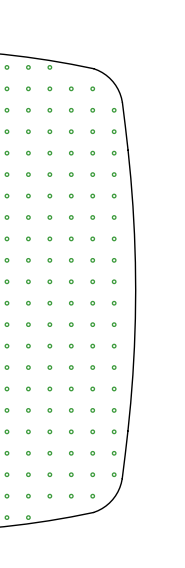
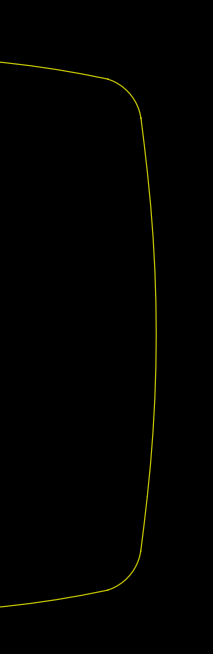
via: (6, 67) -> none
via: (28, 67) -> none
via: (49, 67) -> none
via: (6, 88) -> none
via: (28, 88) -> none
via: (49, 88) -> none
via: (71, 88) -> none
via: (92, 88) -> none
via: (6, 110) -> none
via: (28, 110) -> none
via: (49, 110) -> none
via: (71, 110) -> none
via: (92, 110) -> none
via: (114, 110) -> none
via: (6, 131) -> none
via: (28, 131) -> none
via: (49, 131) -> none
via: (71, 131) -> none
via: (92, 131) -> none
via: (114, 131) -> none
via: (6, 153) -> none
via: (28, 153) -> none
via: (49, 153) -> none
via: (71, 153) -> none
via: (92, 153) -> none
via: (114, 153) -> none
via: (6, 174) -> none
via: (28, 174) -> none
via: (49, 174) -> none
via: (71, 174) -> none
via: (92, 174) -> none
via: (114, 174) -> none
via: (6, 196) -> none
via: (28, 196) -> none
via: (49, 196) -> none
via: (71, 196) -> none
via: (92, 196) -> none
via: (114, 196) -> none
via: (6, 217) -> none
via: (28, 217) -> none
via: (49, 217) -> none
via: (71, 217) -> none
via: (92, 217) -> none
via: (114, 217) -> none
via: (6, 238) -> none
via: (28, 238) -> none
via: (49, 238) -> none
via: (71, 238) -> none
via: (92, 238) -> none
via: (114, 238) -> none
via: (6, 260) -> none
via: (28, 260) -> none
via: (49, 260) -> none
via: (71, 260) -> none
via: (92, 260) -> none
via: (114, 260) -> none
via: (6, 281) -> none
via: (28, 281) -> none
via: (49, 281) -> none
via: (71, 281) -> none
via: (92, 281) -> none
via: (114, 281) -> none
via: (6, 303) -> none
via: (28, 303) -> none
via: (49, 303) -> none
via: (71, 303) -> none
via: (92, 303) -> none
via: (114, 303) -> none
via: (6, 324) -> none
via: (28, 324) -> none
via: (49, 324) -> none
via: (71, 324) -> none
via: (92, 324) -> none
via: (114, 324) -> none
via: (6, 346) -> none
via: (28, 346) -> none
via: (49, 346) -> none
via: (71, 346) -> none
via: (92, 346) -> none
via: (114, 346) -> none
via: (6, 367) -> none
via: (28, 367) -> none
via: (49, 367) -> none
via: (71, 367) -> none
via: (92, 367) -> none
via: (114, 367) -> none
via: (6, 388) -> none
via: (28, 388) -> none
via: (49, 388) -> none
via: (71, 388) -> none
via: (92, 388) -> none
via: (114, 388) -> none
via: (6, 410) -> none
via: (28, 410) -> none
via: (49, 410) -> none
via: (71, 410) -> none
via: (92, 410) -> none
via: (114, 410) -> none
via: (6, 431) -> none
via: (28, 431) -> none
via: (49, 431) -> none
via: (71, 431) -> none
via: (92, 431) -> none
via: (114, 431) -> none
via: (6, 453) -> none
via: (28, 453) -> none
via: (49, 453) -> none
via: (71, 453) -> none
via: (92, 453) -> none
via: (114, 453) -> none
via: (6, 474) -> none
via: (28, 474) -> none
via: (49, 474) -> none
via: (71, 474) -> none
via: (92, 474) -> none
via: (114, 474) -> none
via: (6, 496) -> none
via: (28, 496) -> none
via: (49, 496) -> none
via: (71, 496) -> none
via: (92, 496) -> none
via: (6, 517) -> none
via: (28, 517) -> none

